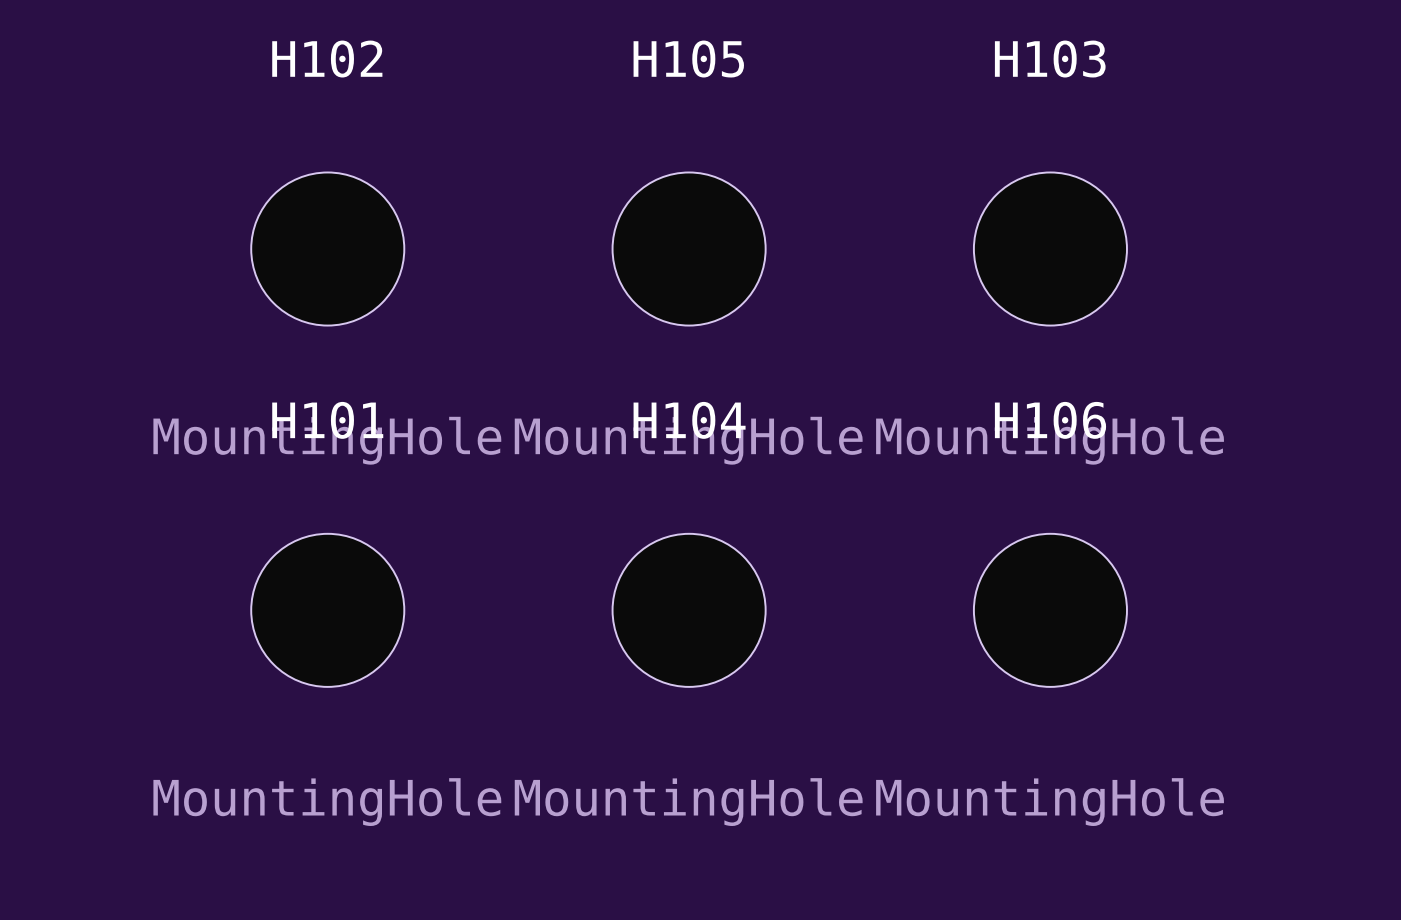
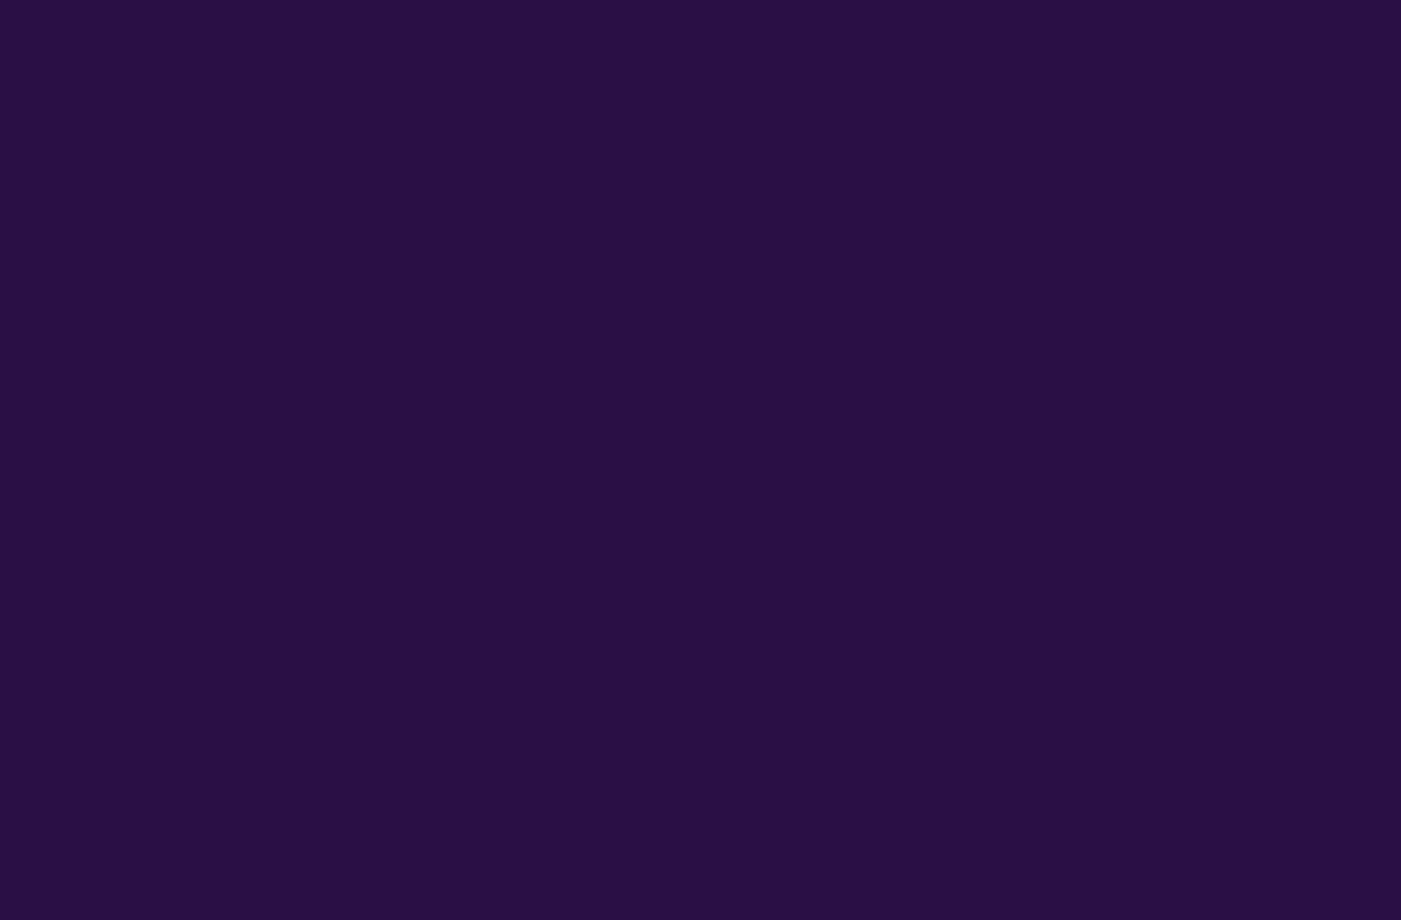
H102: MountingHole (327, 249) -> none
H105: MountingHole (689, 249) -> none
H103: MountingHole (1050, 249) -> none
H101: MountingHole (327, 610) -> none
H104: MountingHole (689, 610) -> none
H106: MountingHole (1050, 610) -> none

